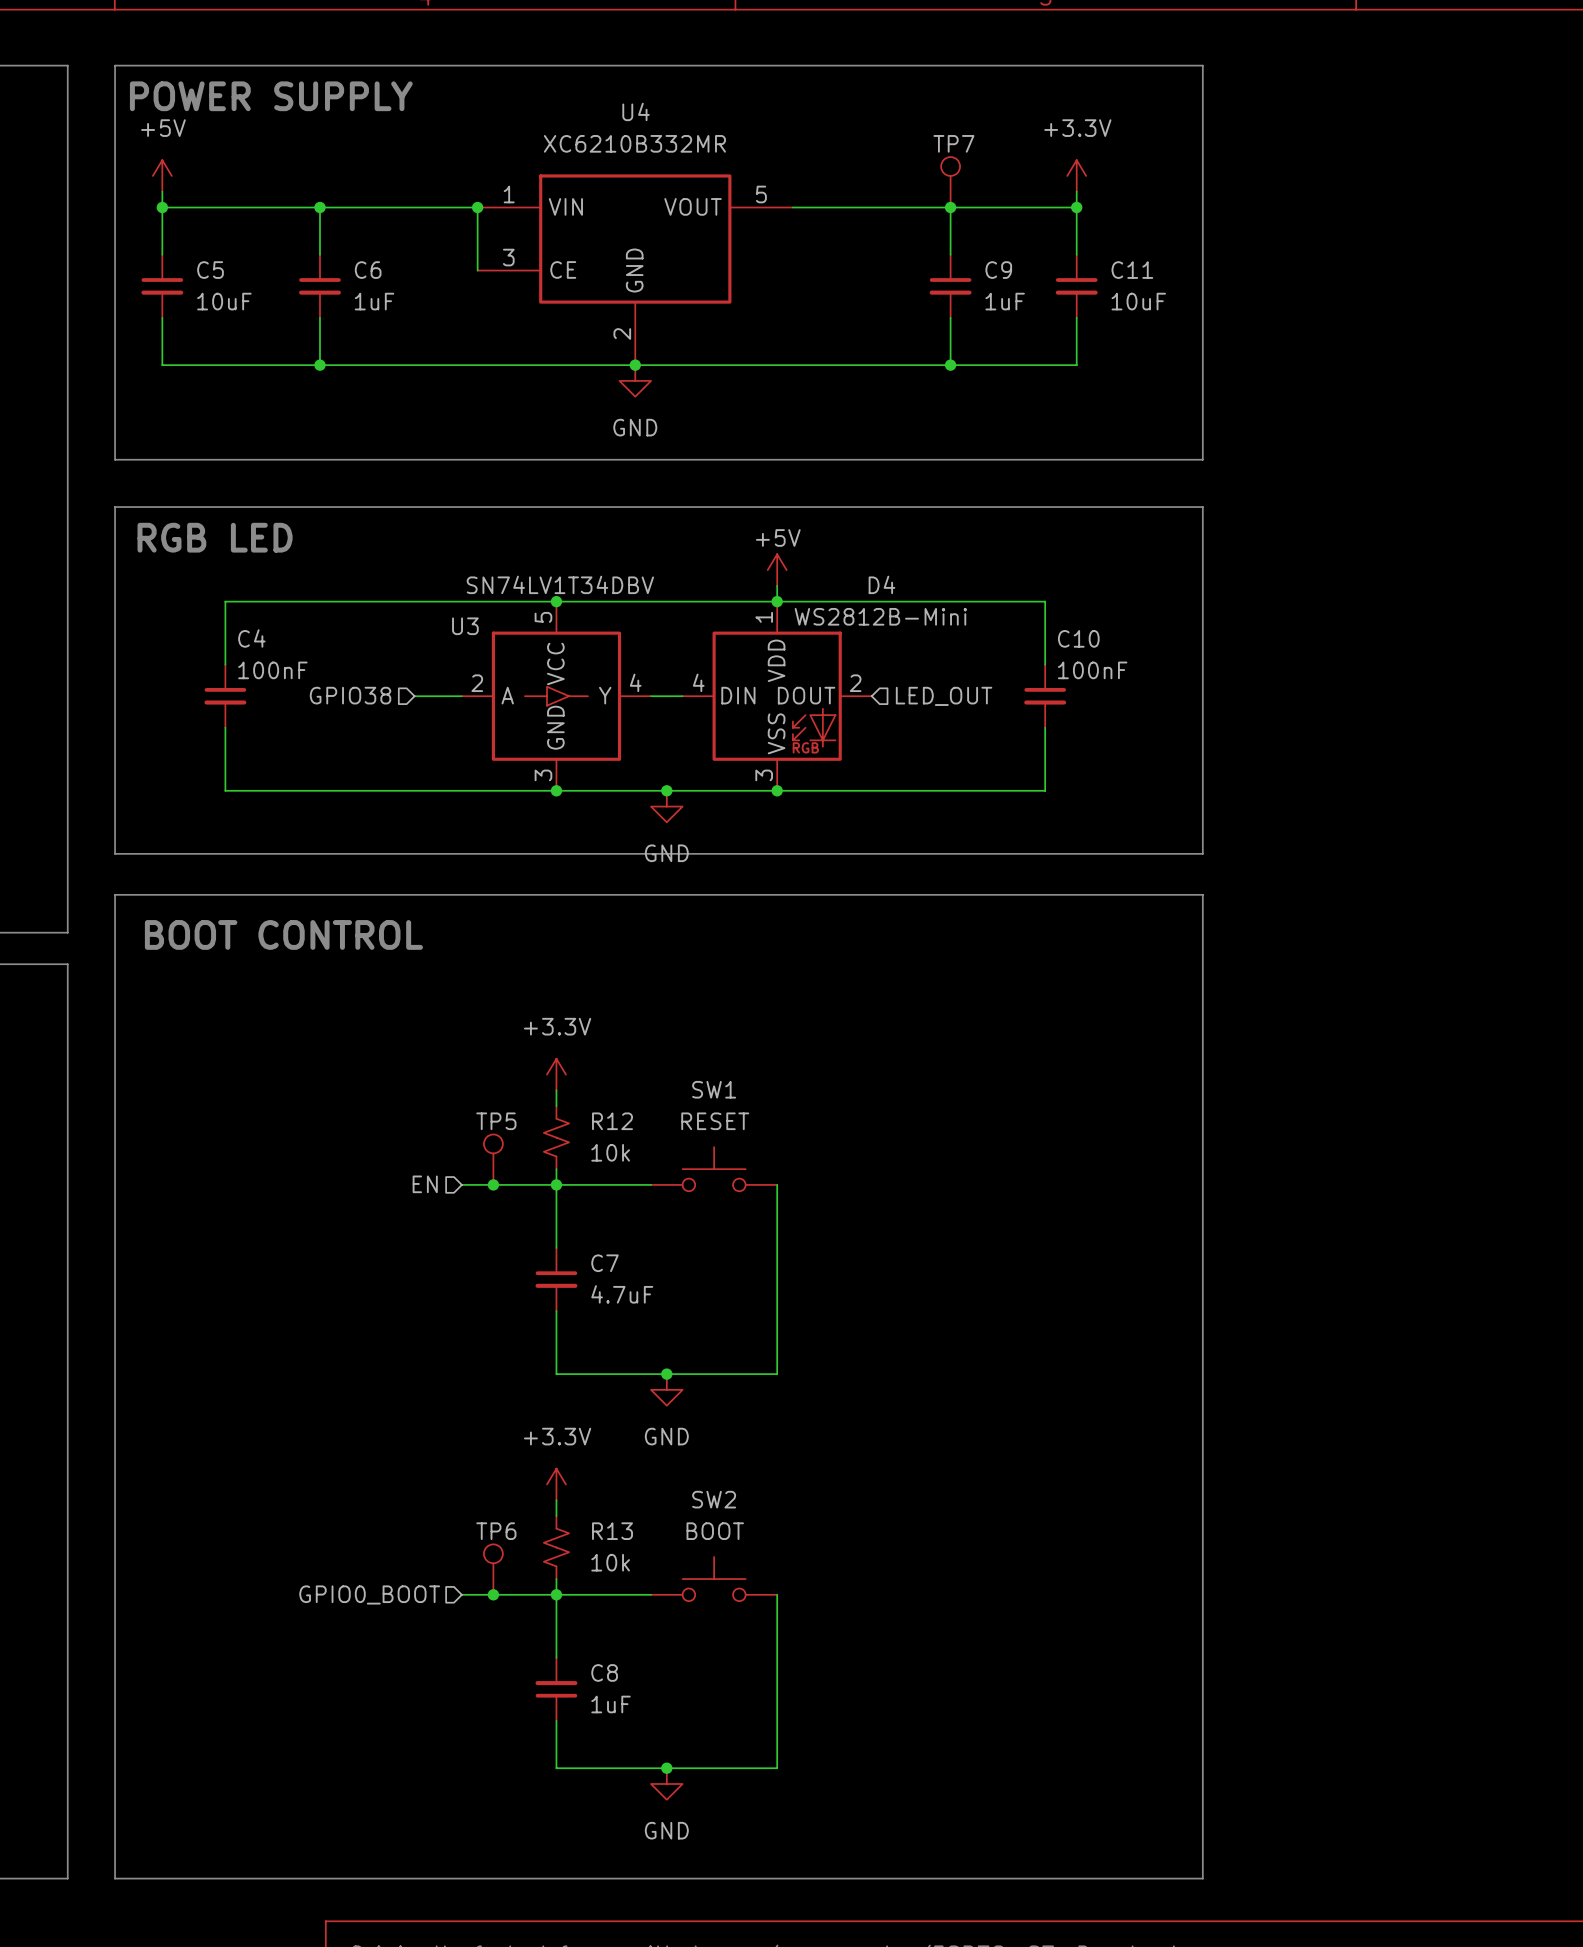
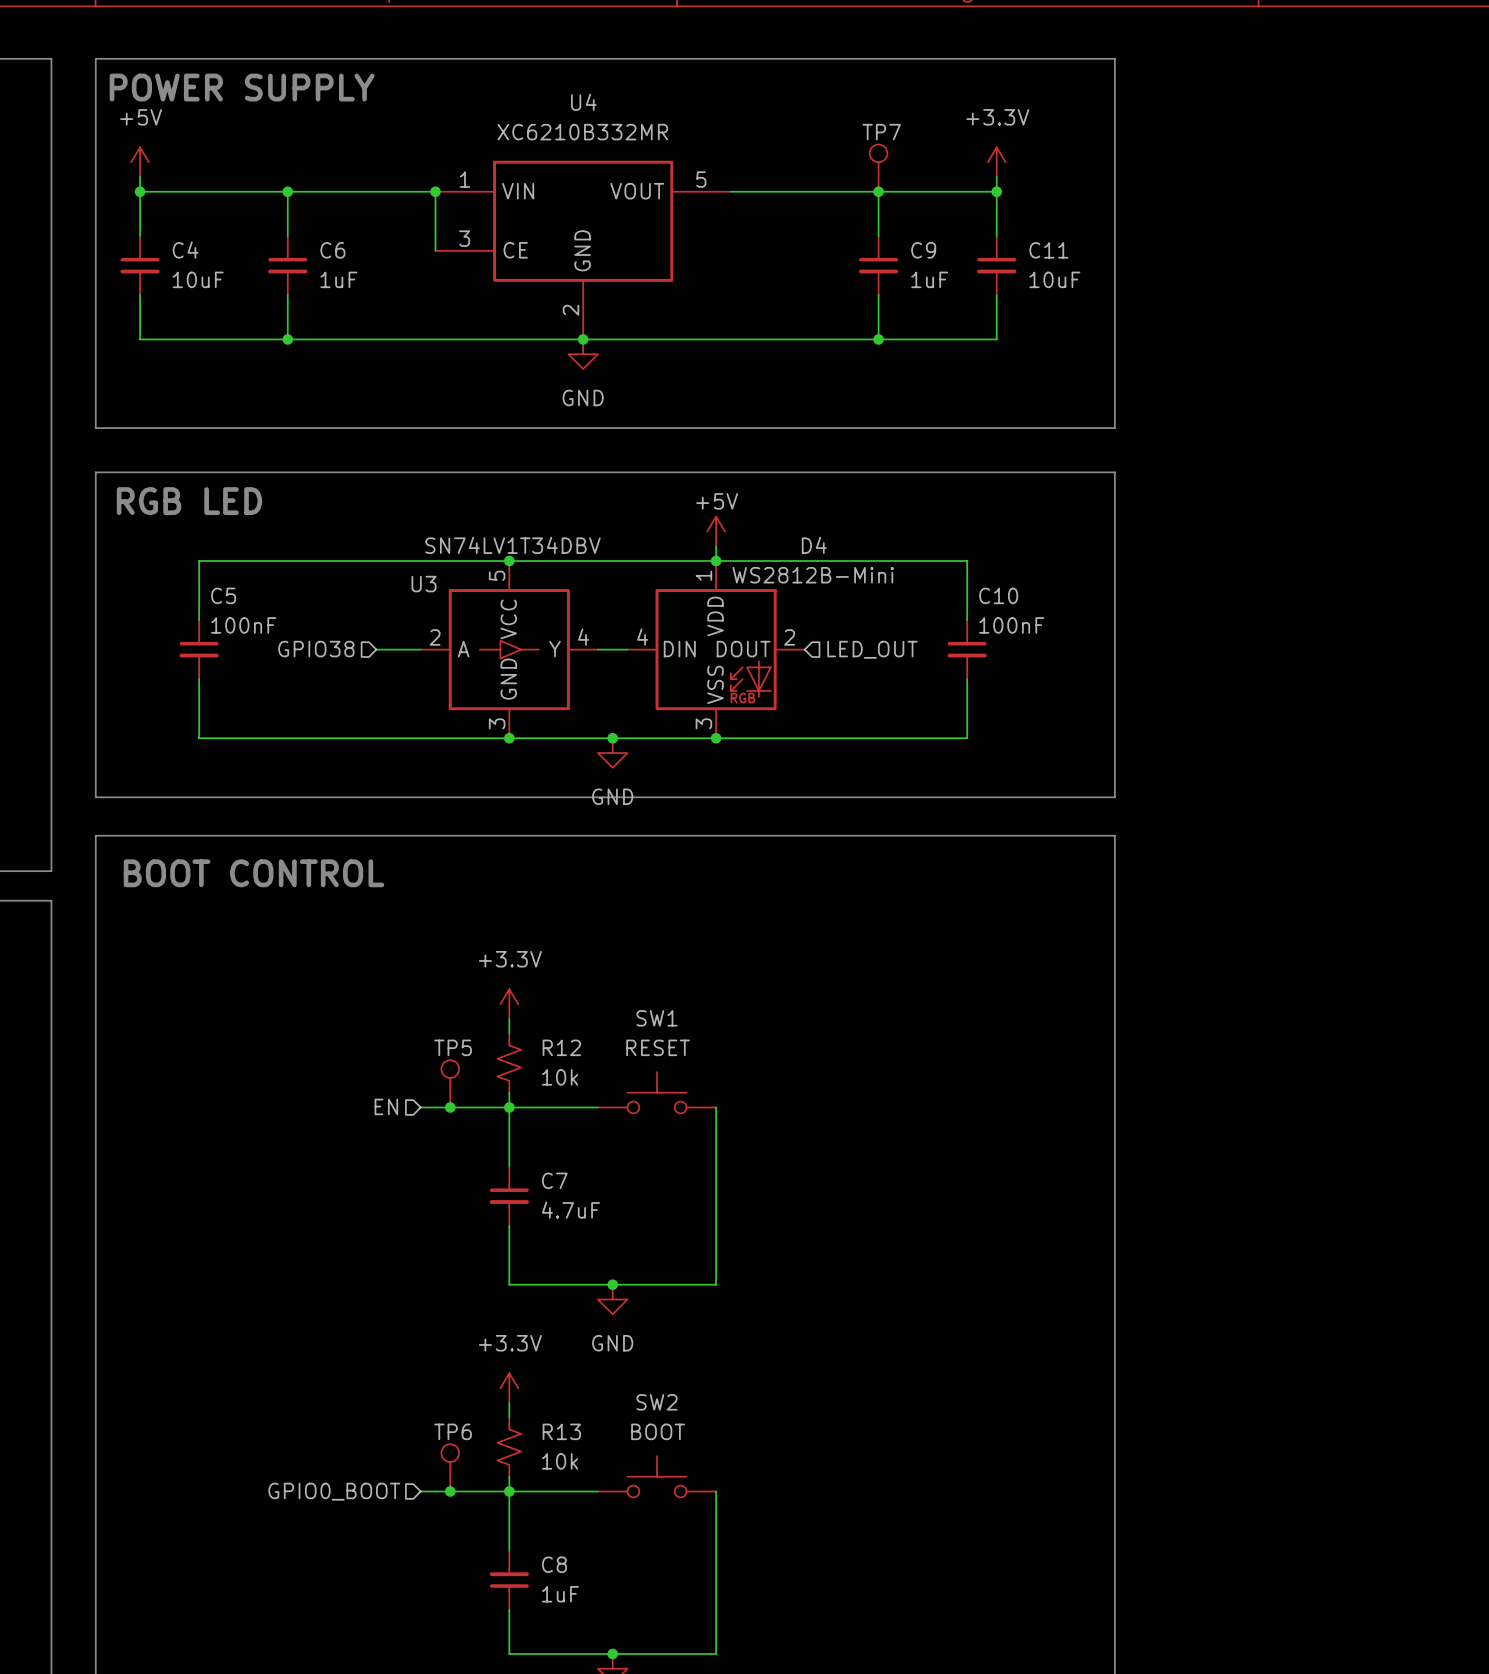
C5 name: C5 (210, 270) -> C4 (185, 249)
C4 name: C4 (251, 638) -> C5 (223, 595)

